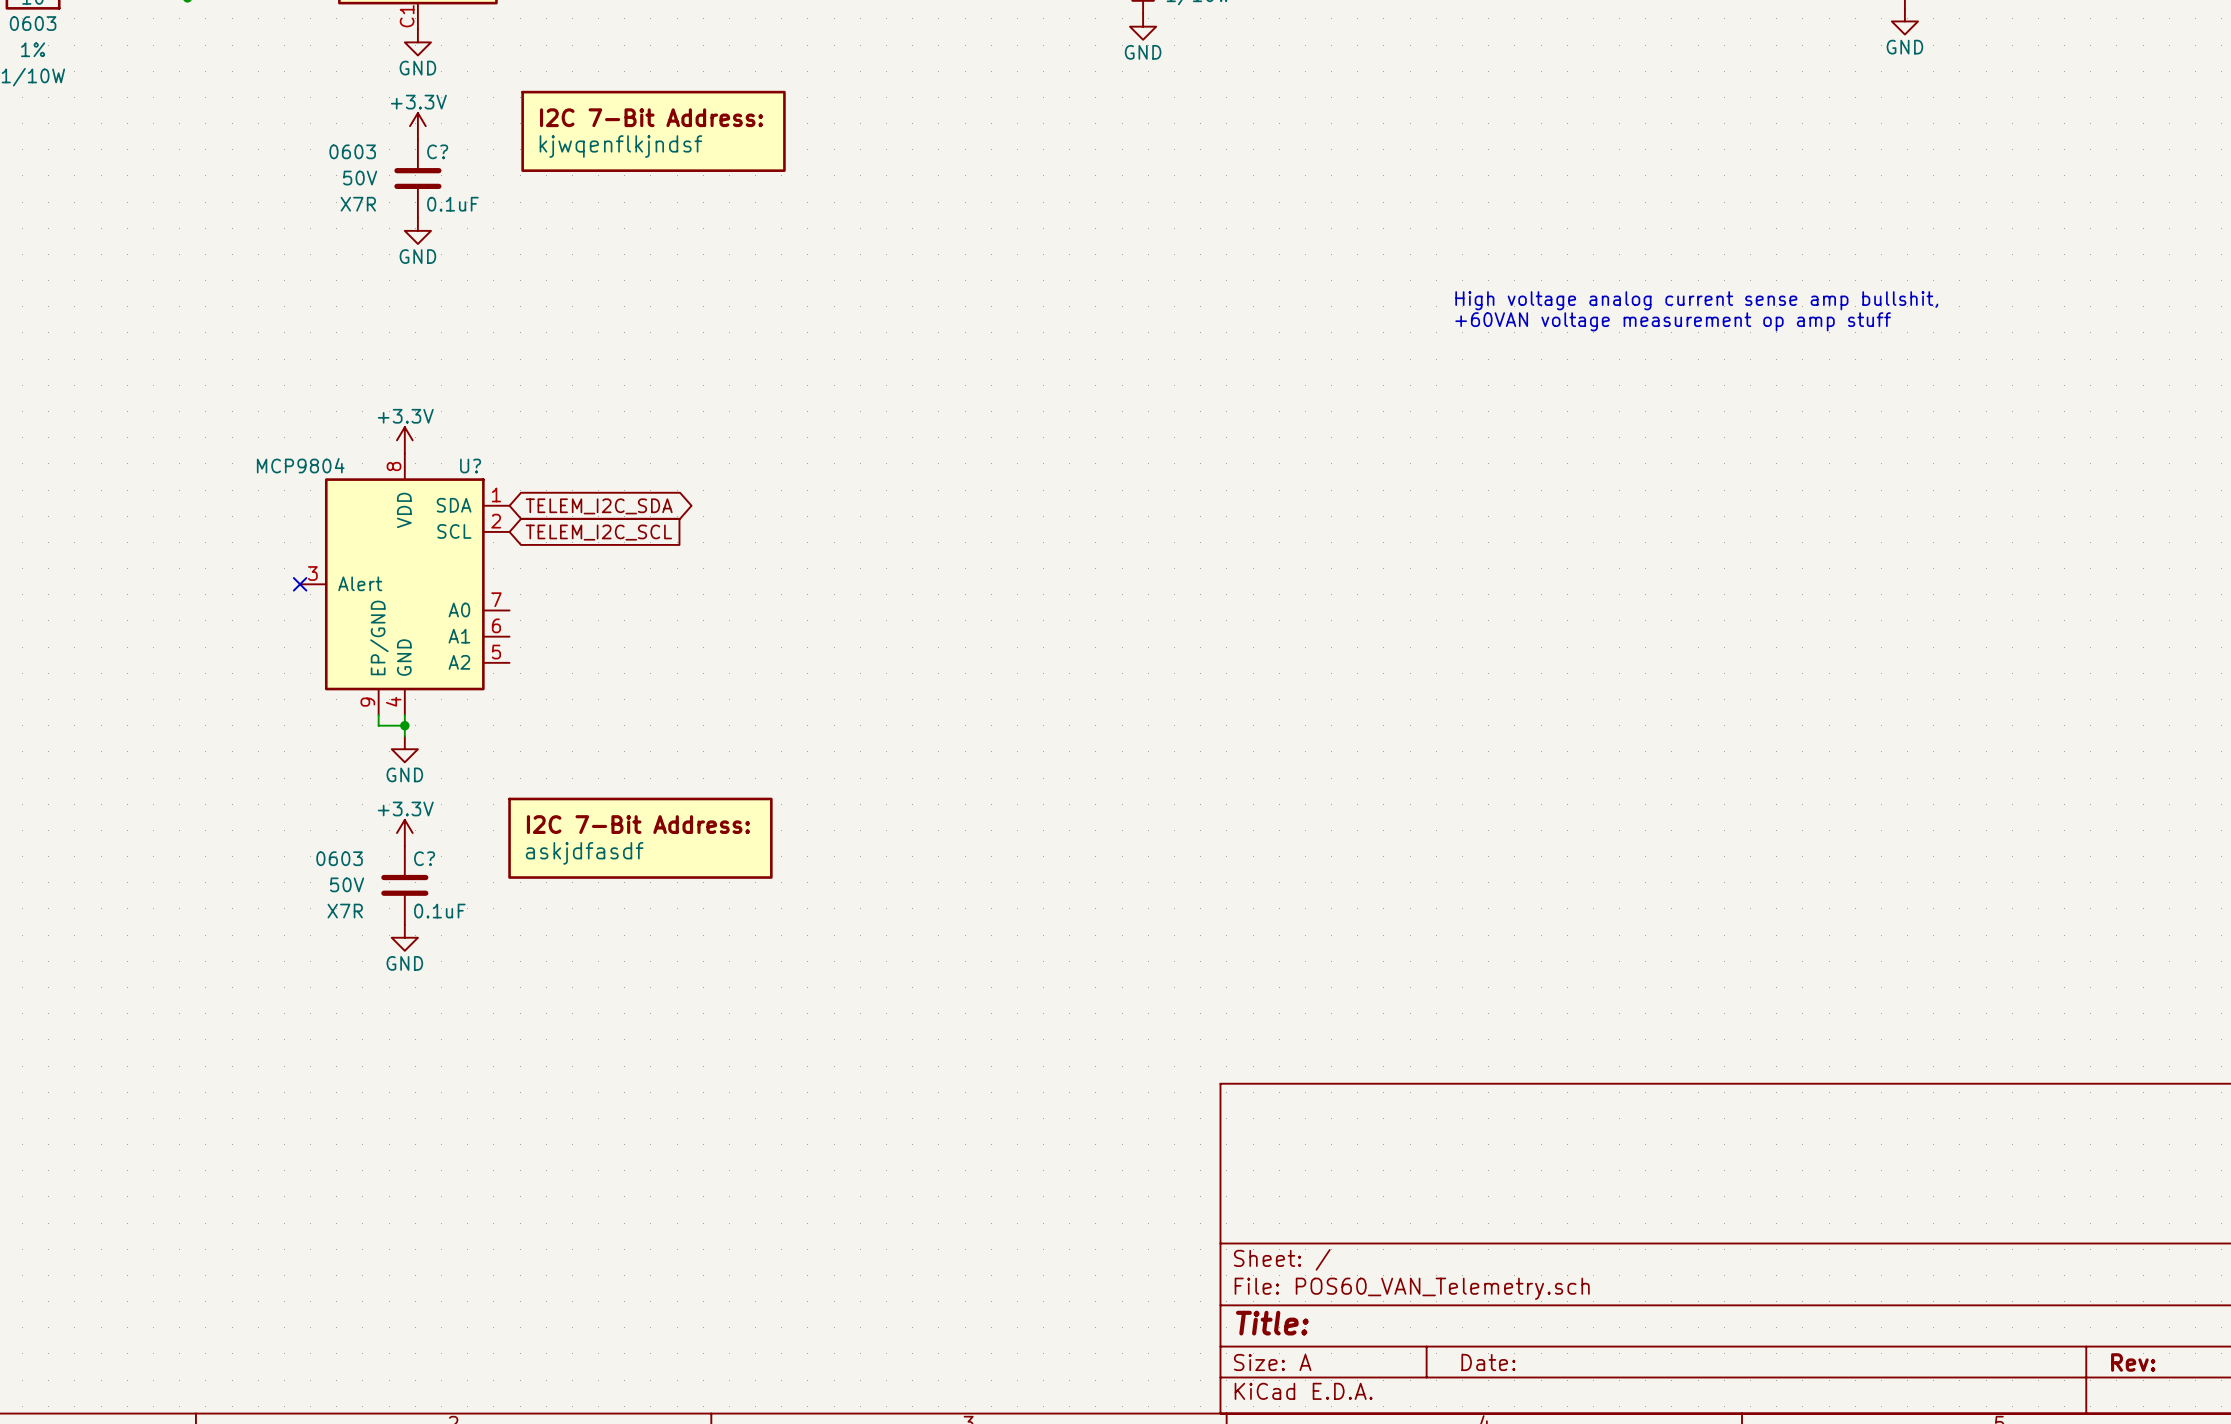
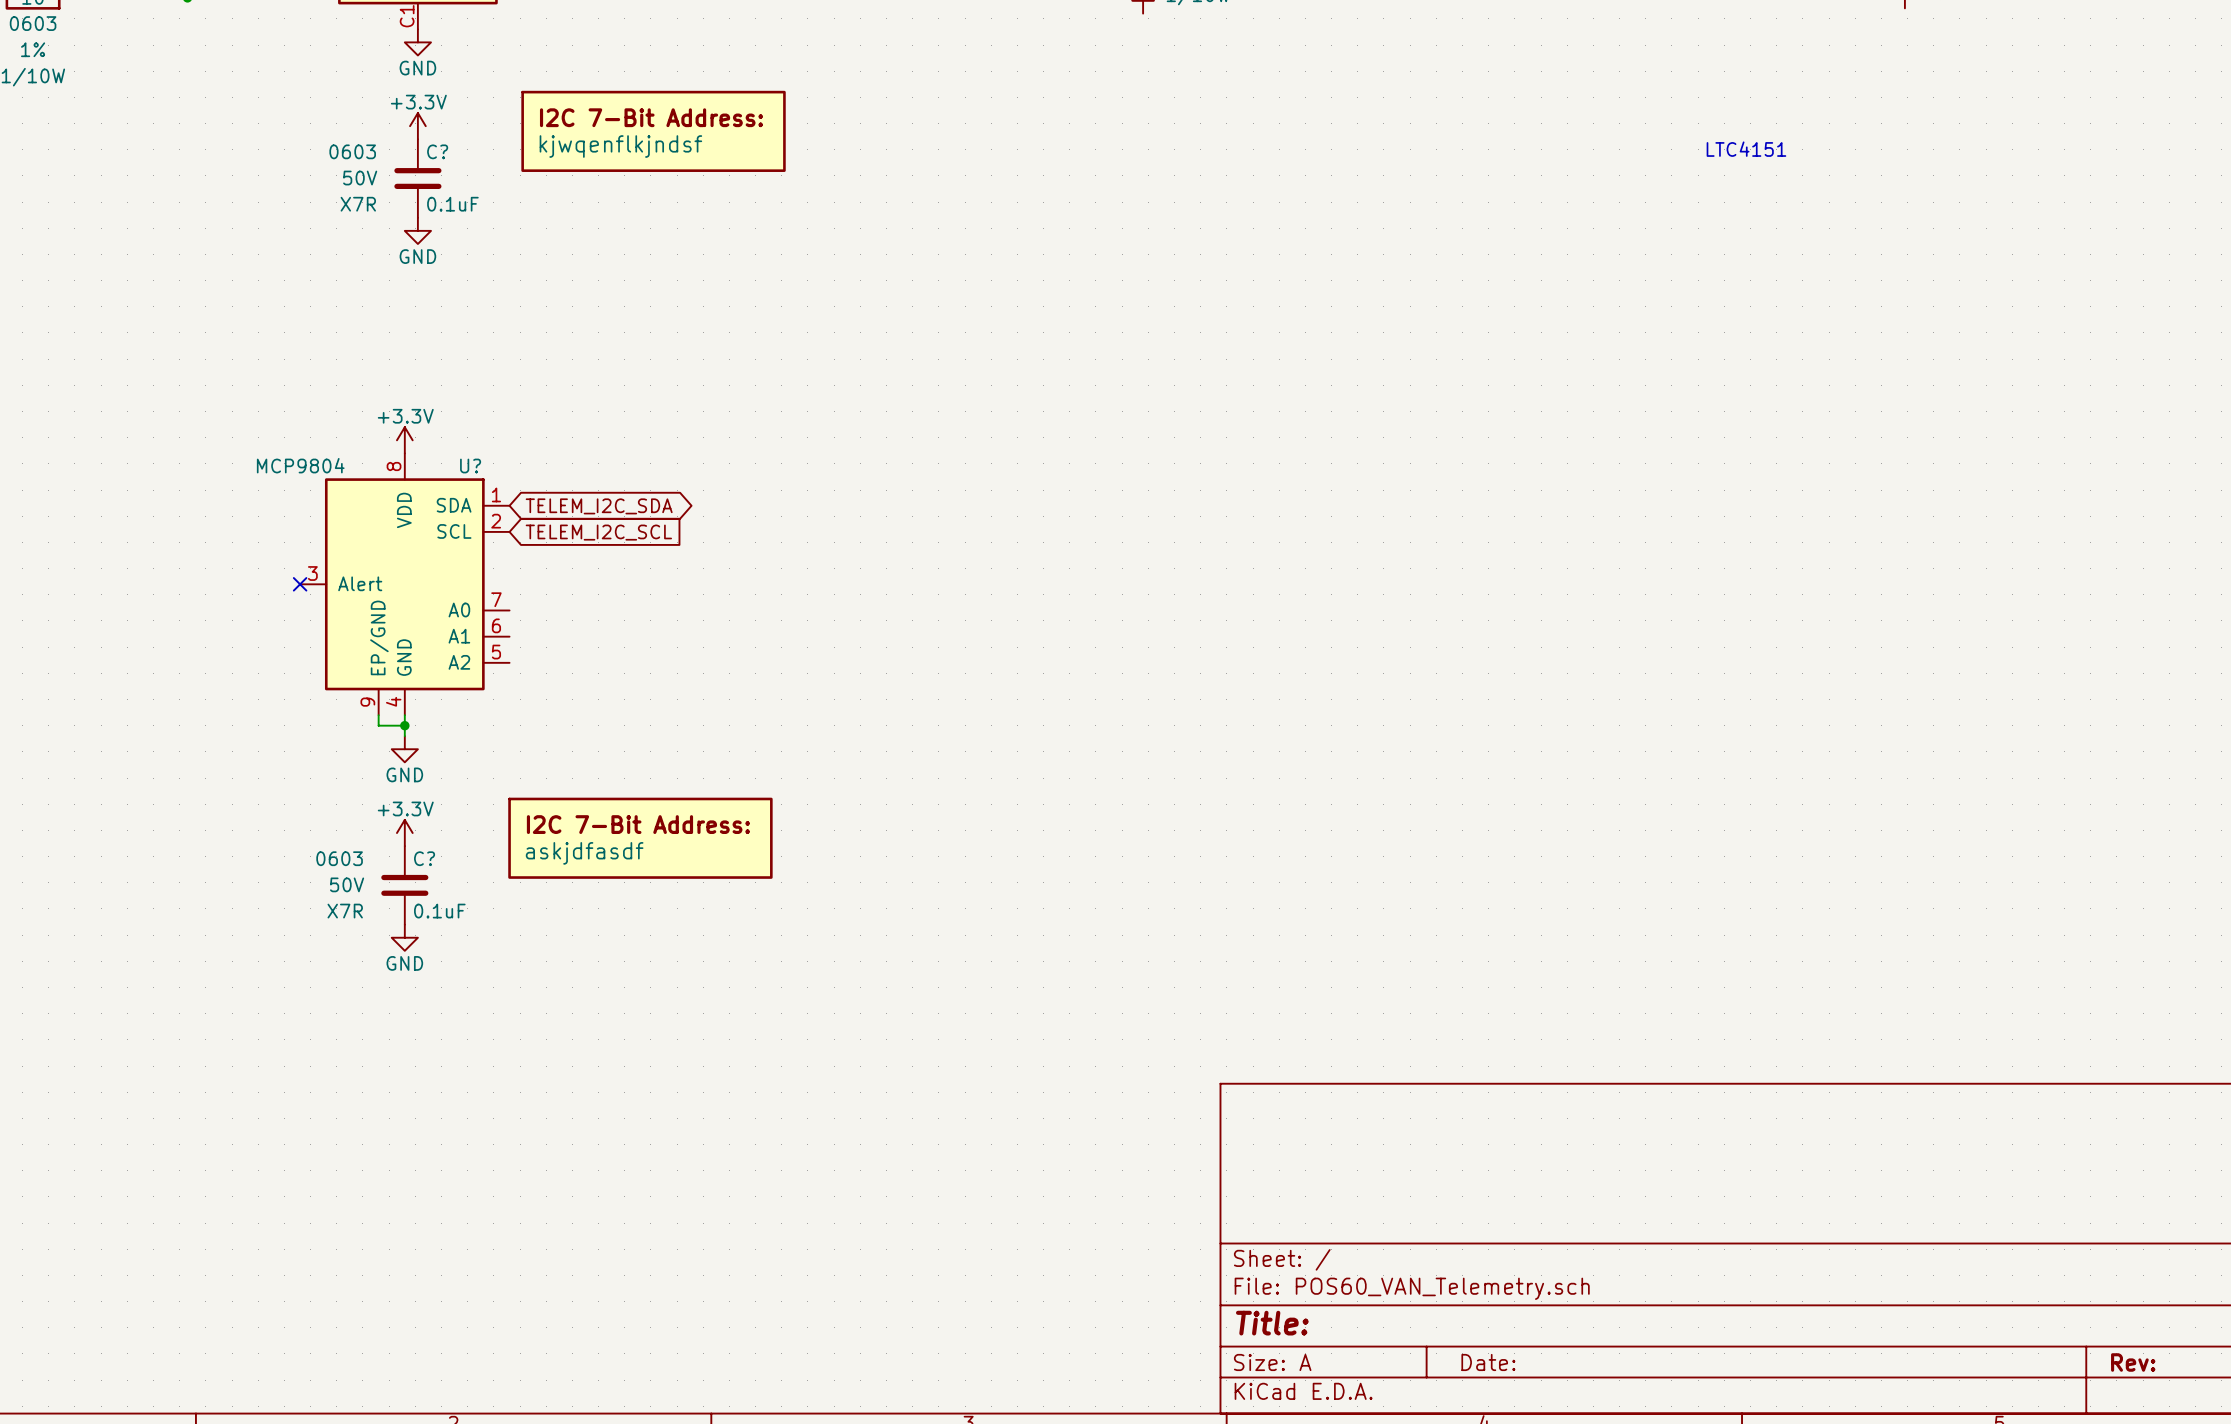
power symbol: GND (1904, 21) -> none
power symbol: GND (1143, 26) -> none
text: none -> LTC4151 (1746, 149)
text: High voltage analog current sense amp bullshit, (1696, 300) -> none
text: +60VAN voltage measurement op amp stuff (1673, 321) -> none

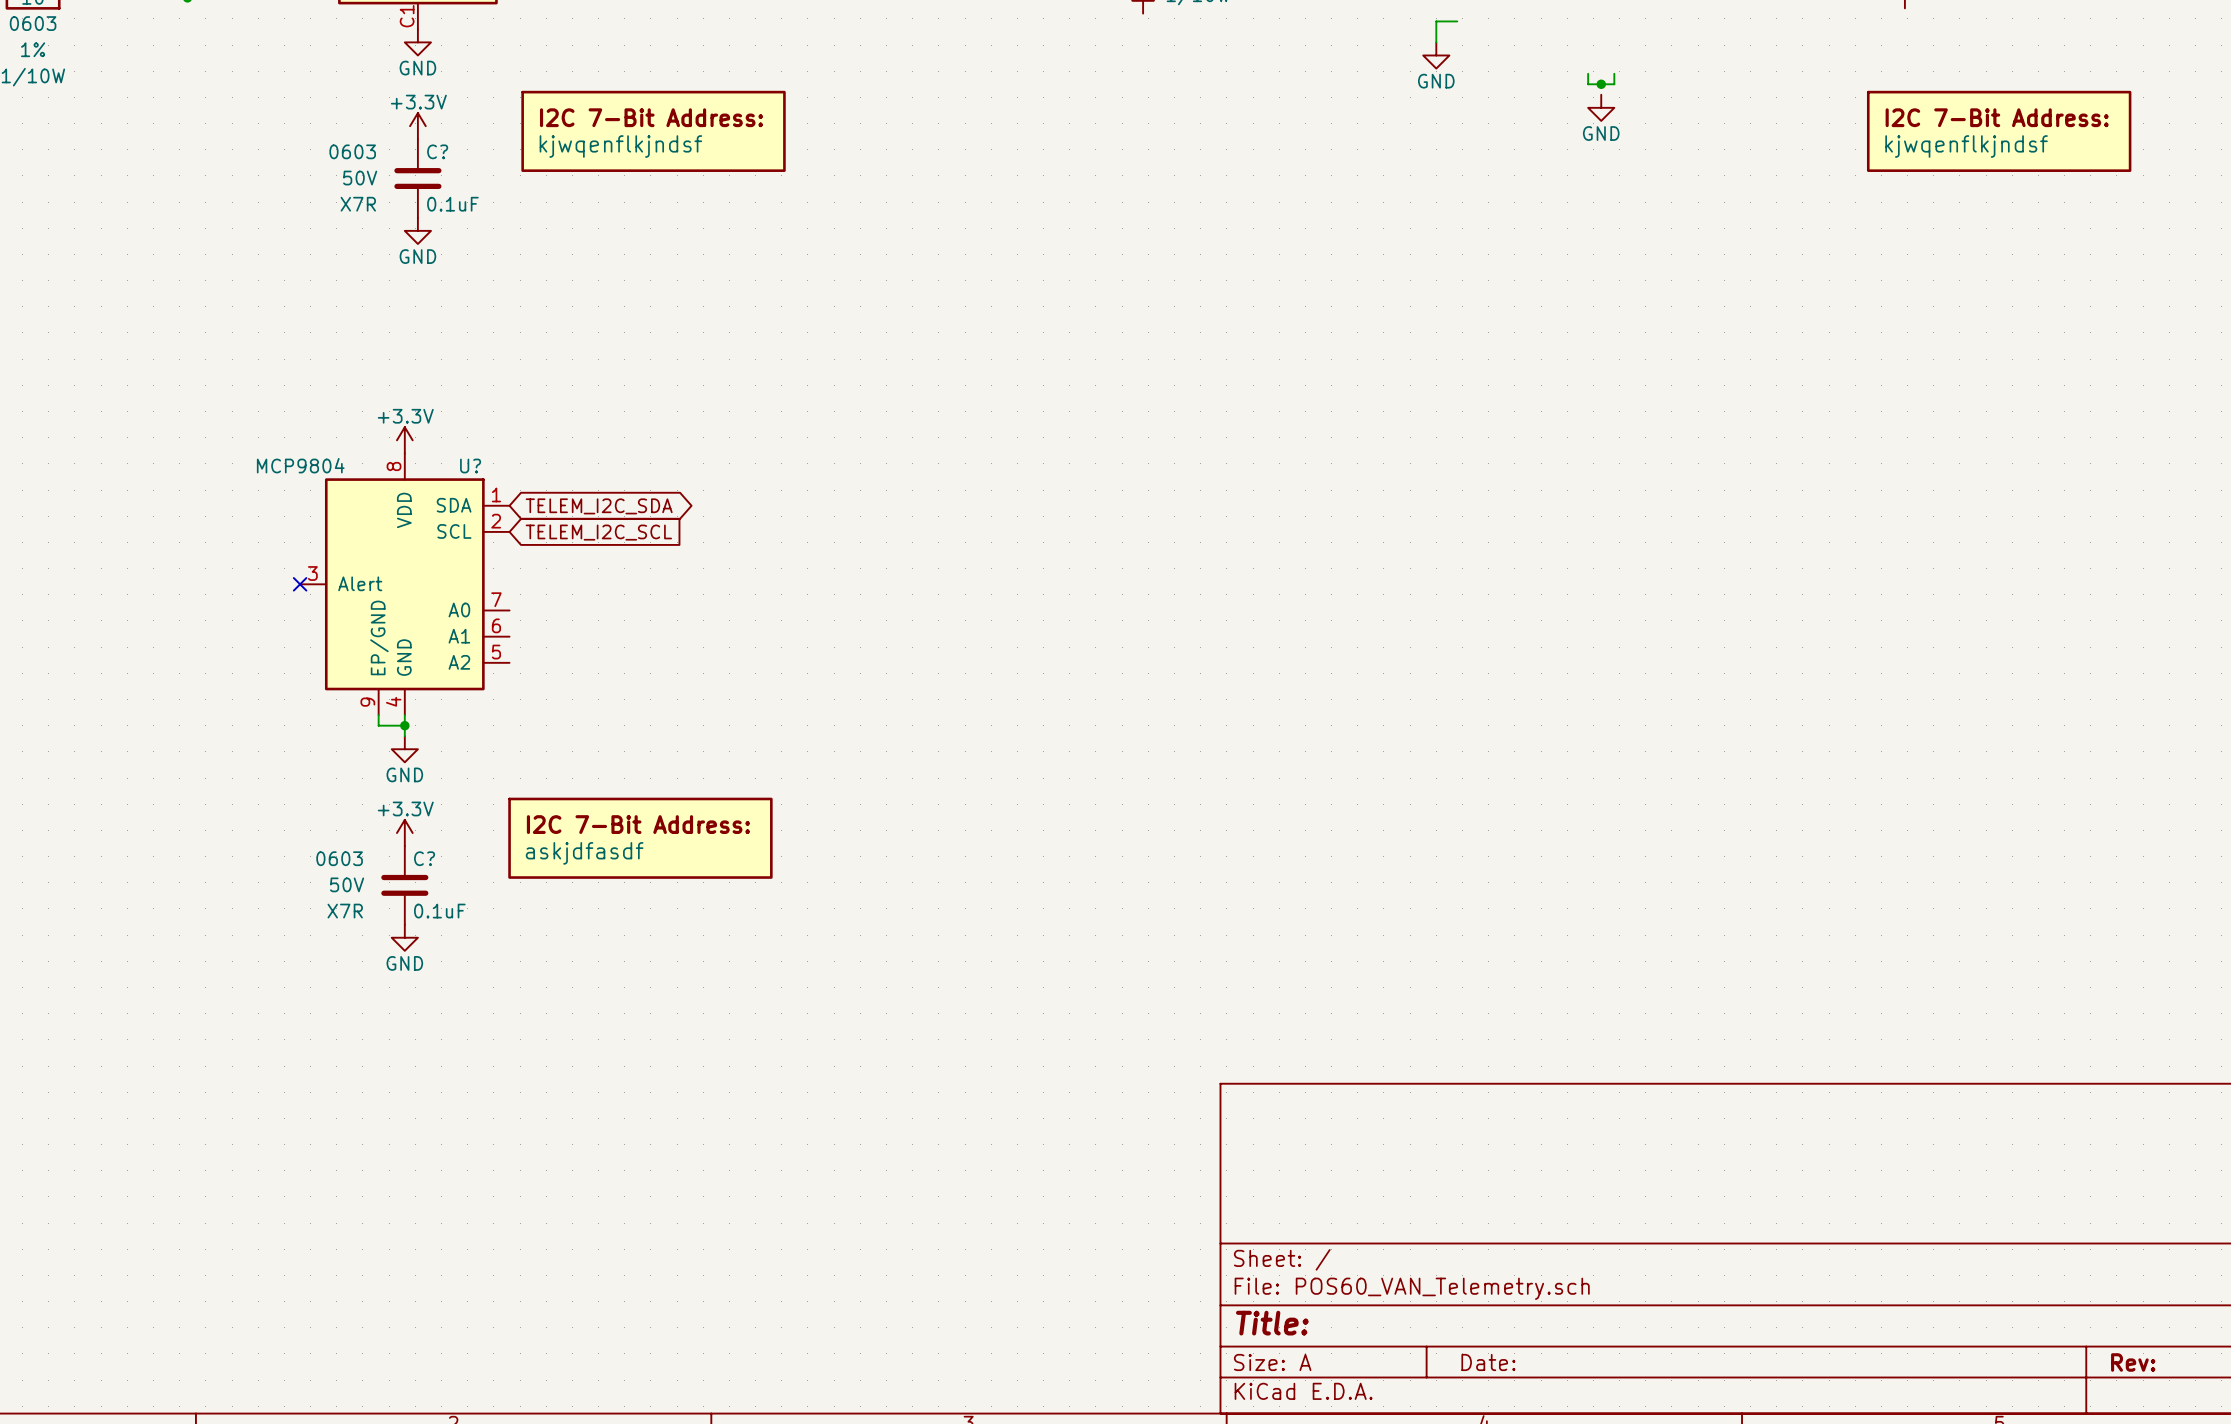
wire: none -> (1457, 21) (1436, 21) (1436, 42)
power symbol: none -> GND (1436, 55)
wire: none -> (1588, 73) (1588, 84) (1614, 84) (1614, 73)
junction: none -> (1601, 84)
power symbol: none -> GND (1601, 107)
part: none -> kjwqenflkjndsf (1999, 131)
text: LTC4151 (1746, 149) -> none

